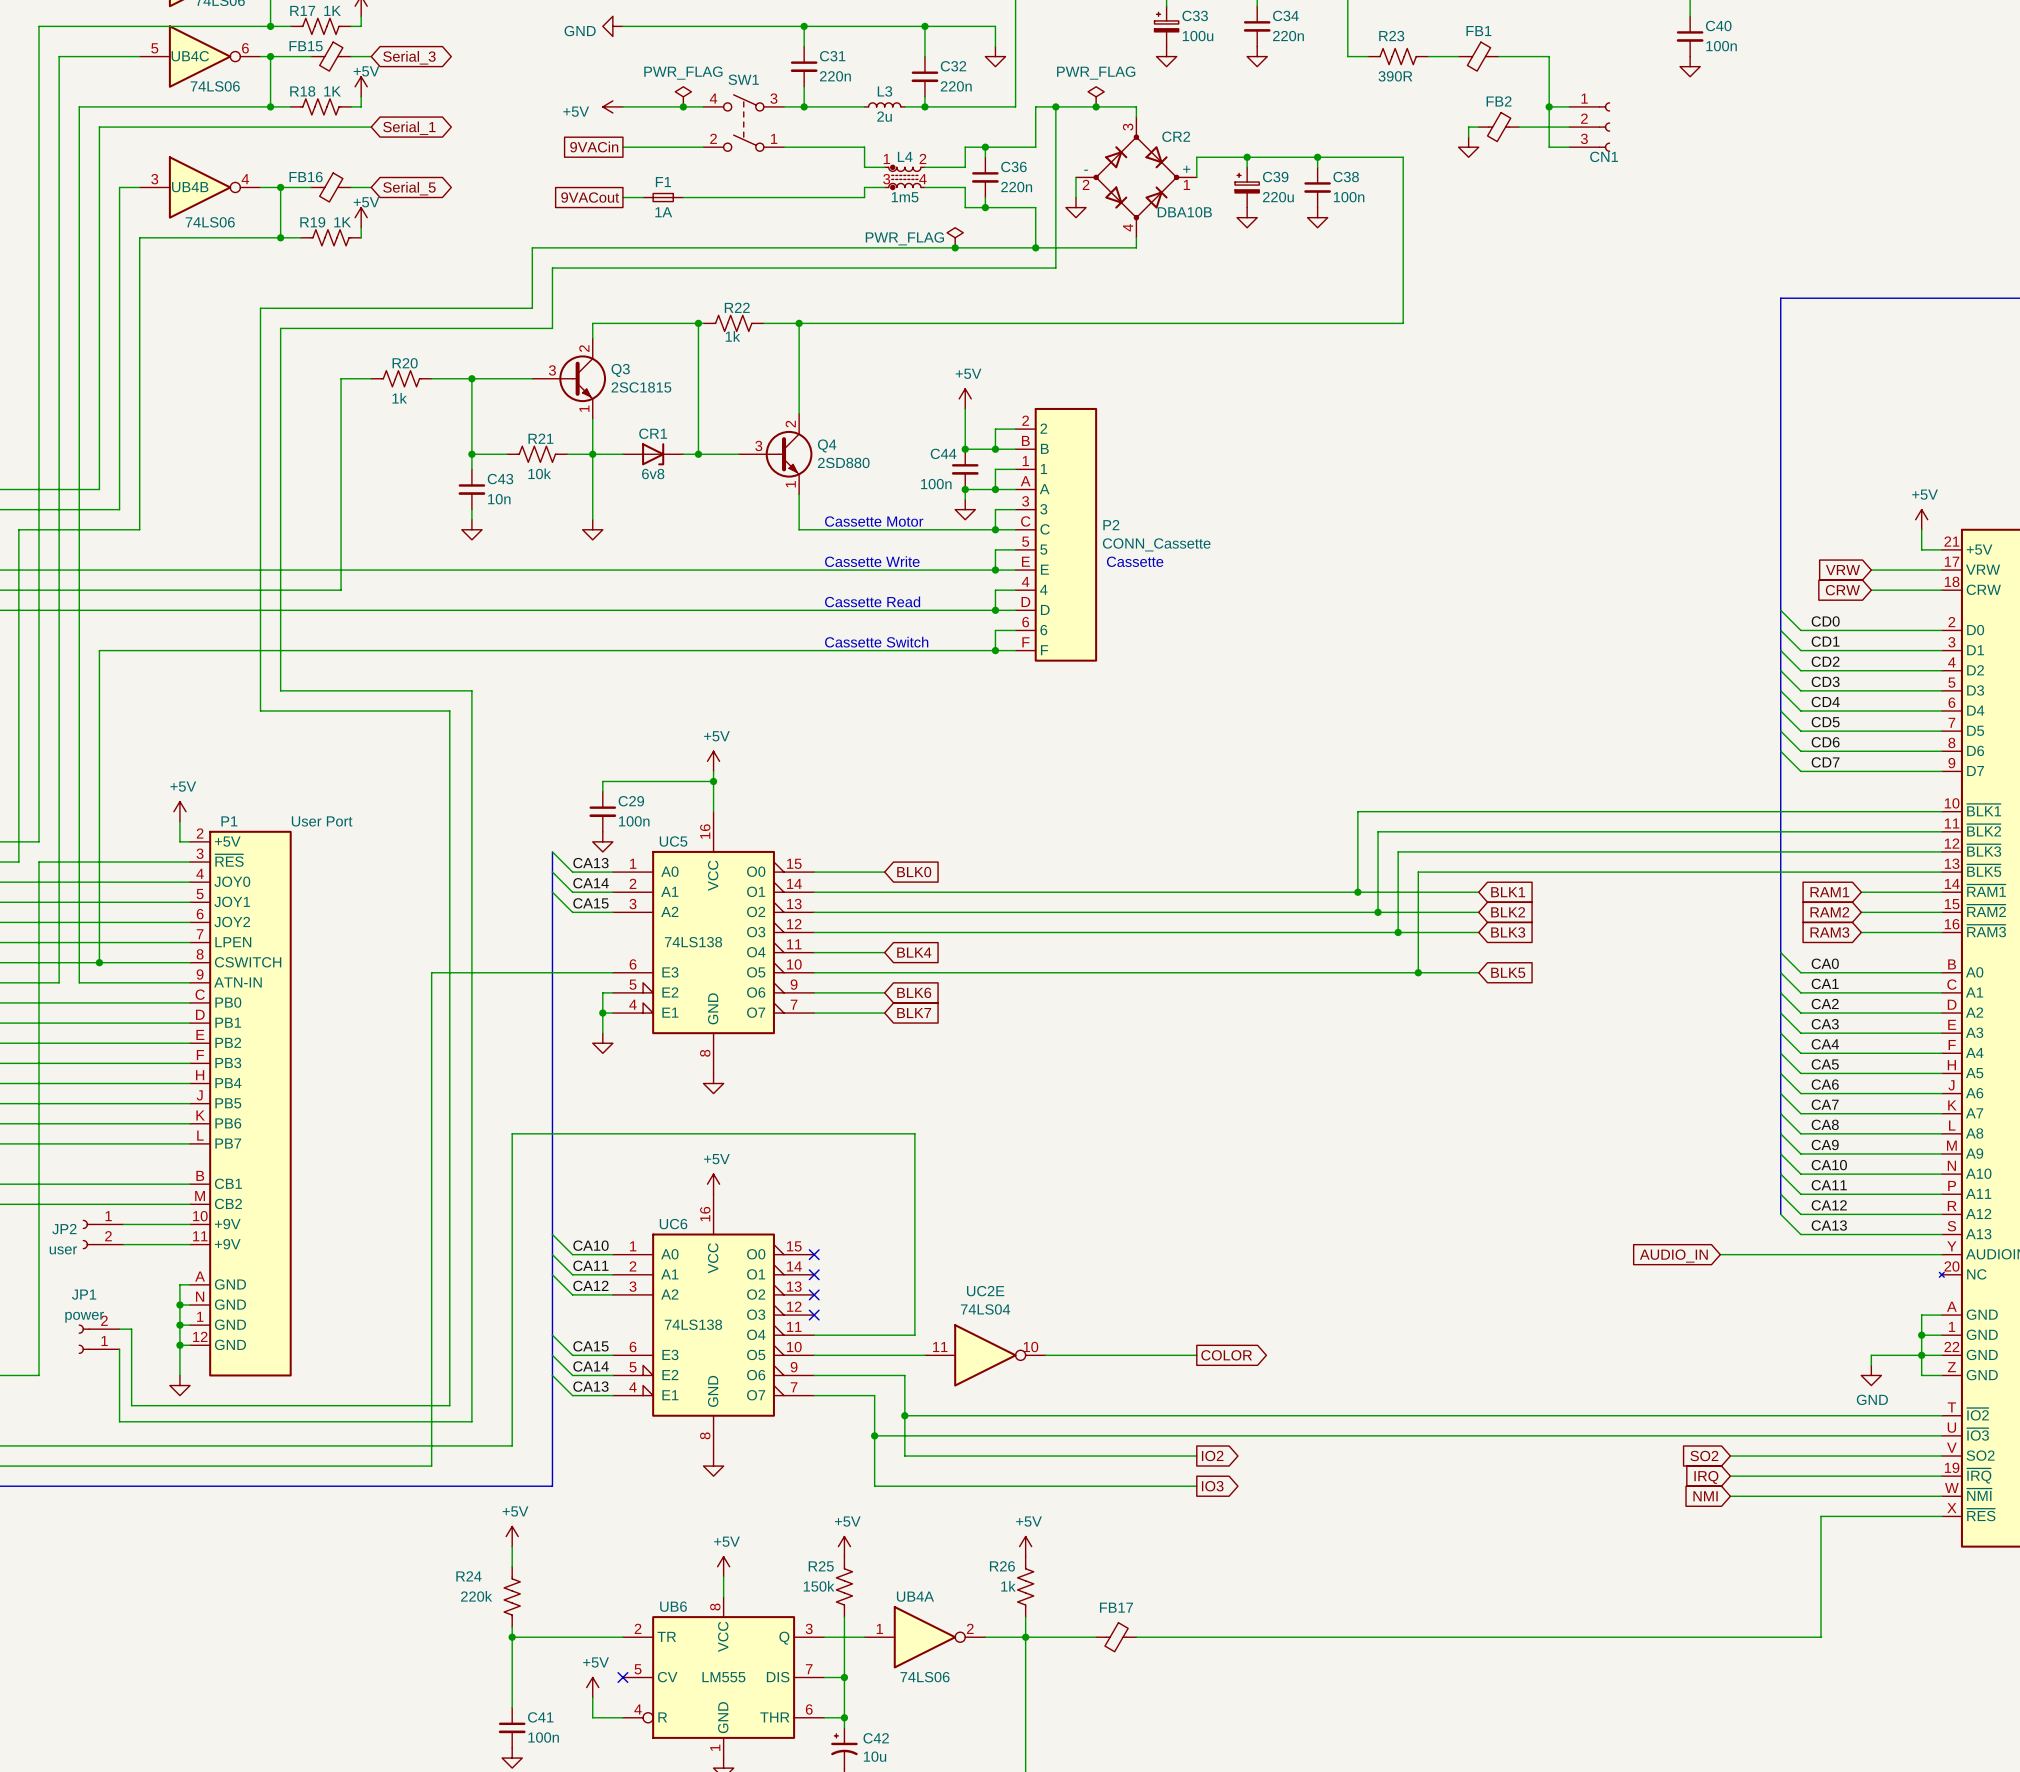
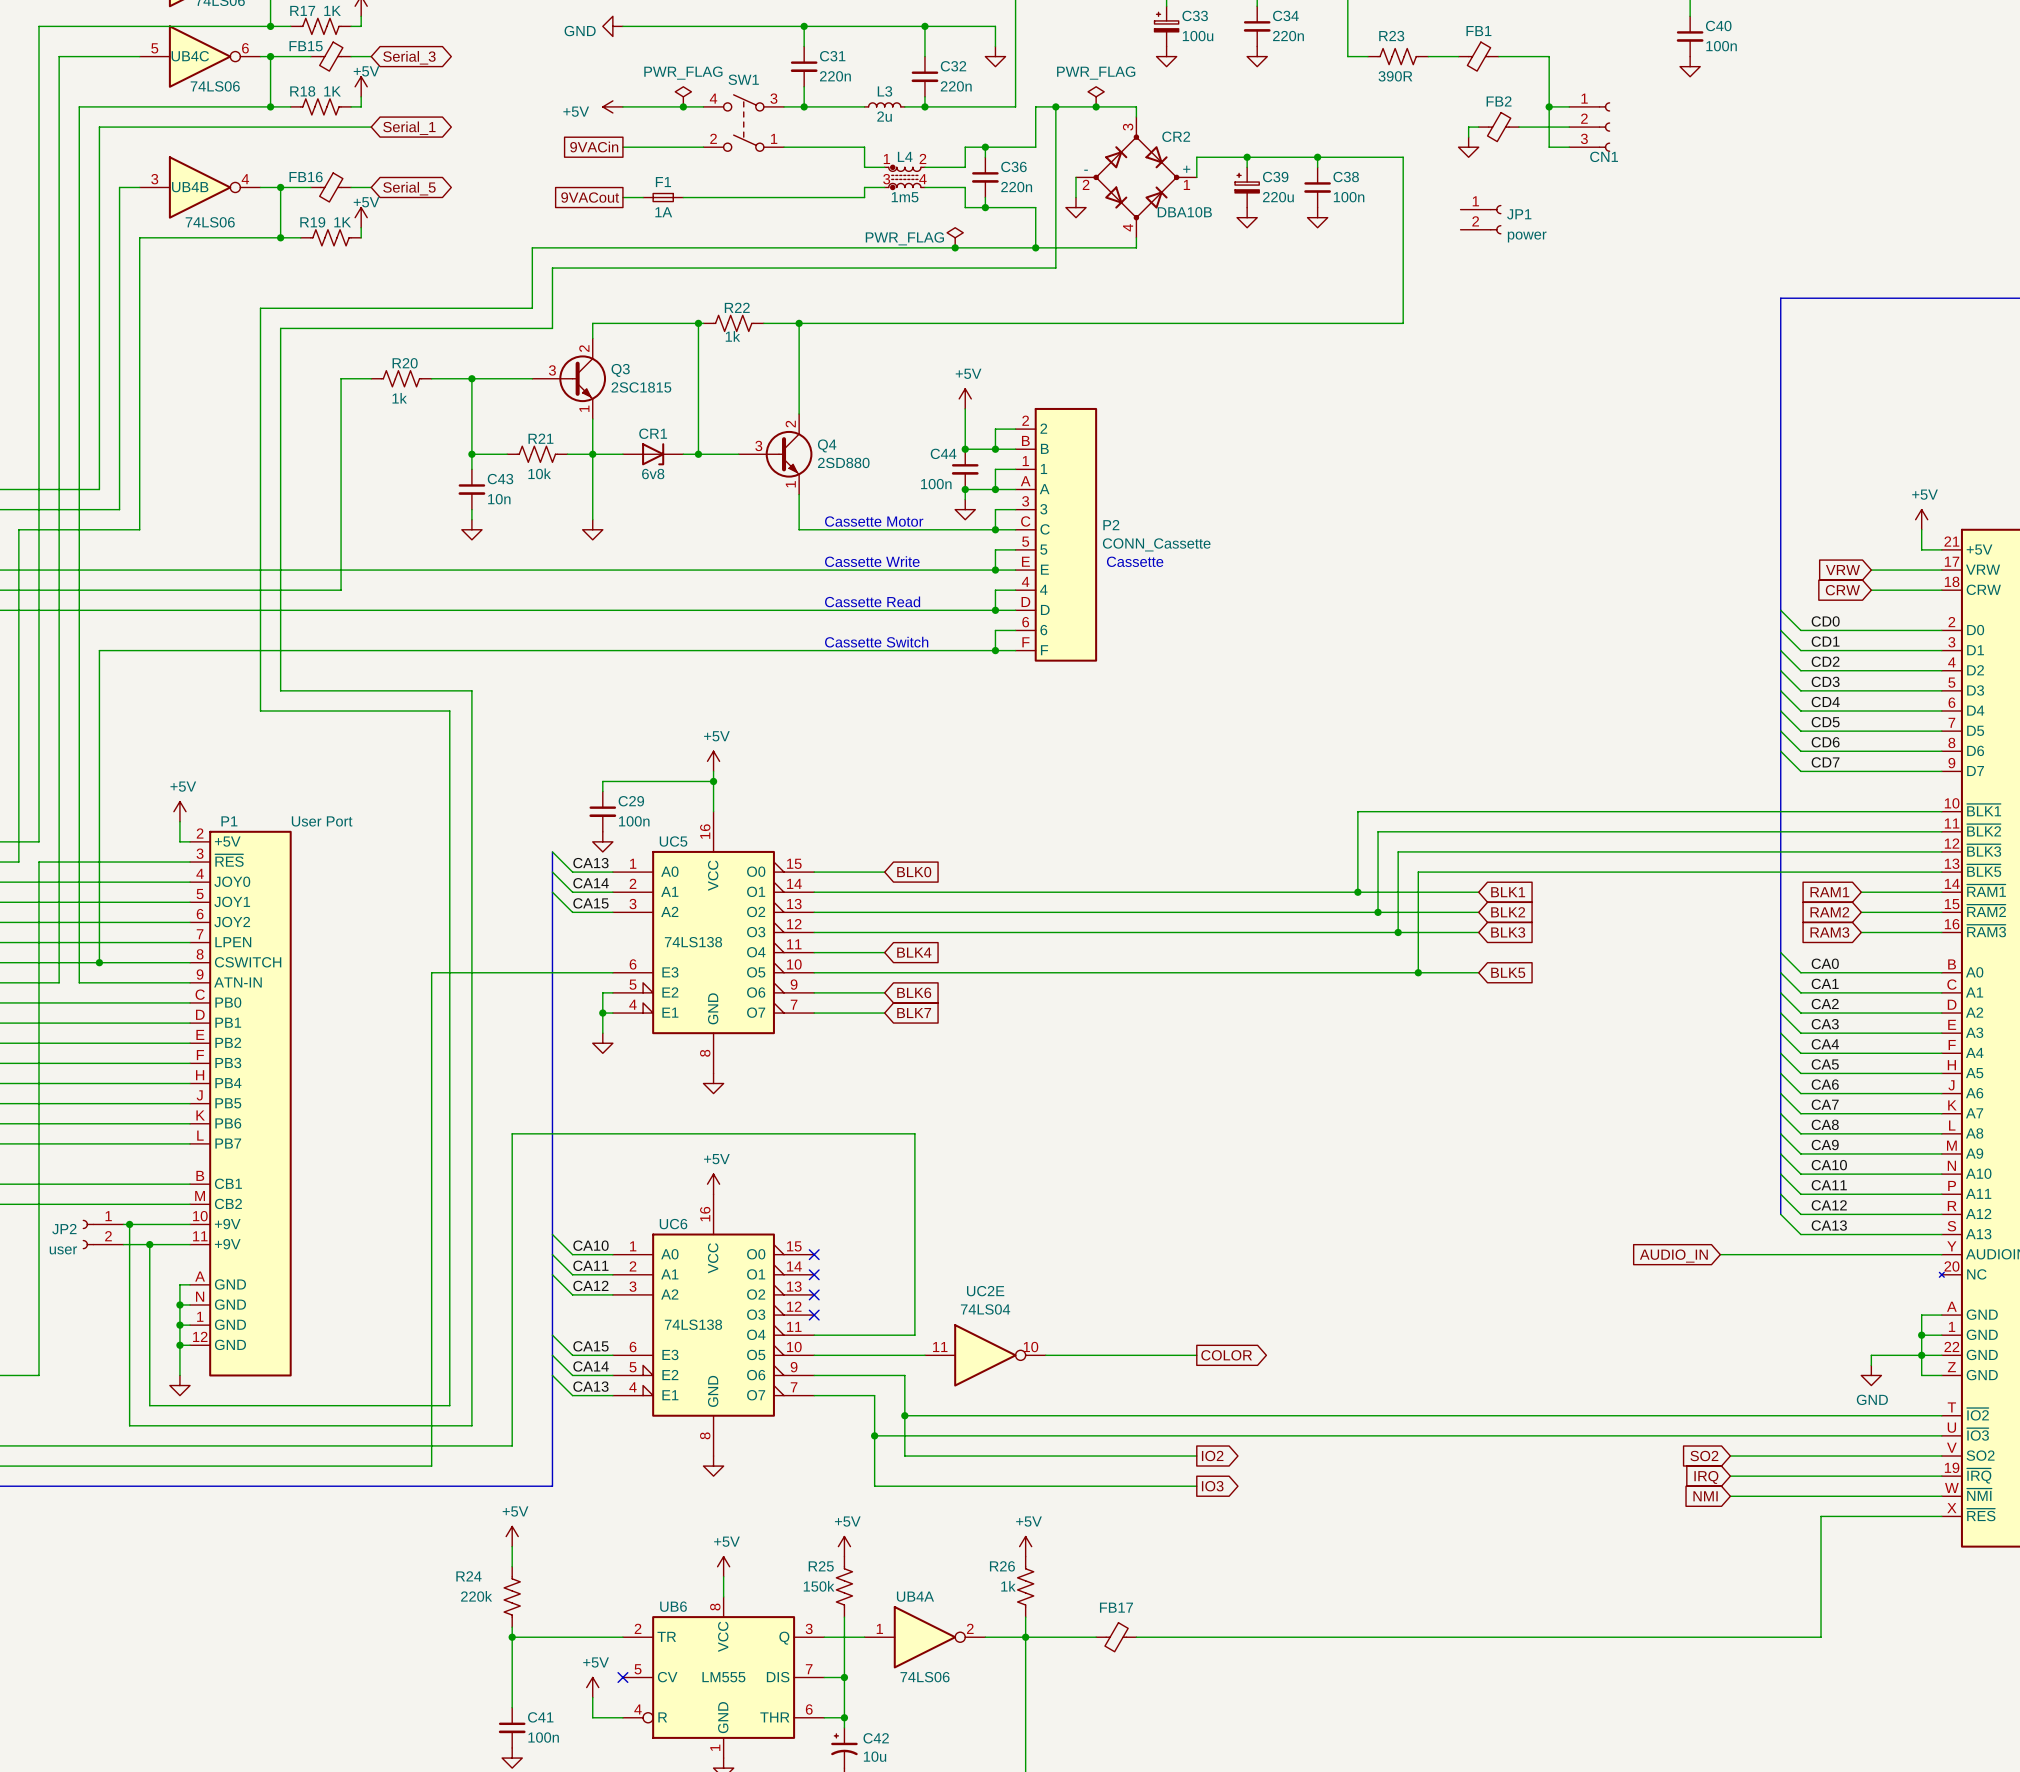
junction: none -> (129, 1224)
junction: none -> (149, 1244)
JP1 name position: JP1 (84, 1294) -> JP1 (1519, 214)
JP1 value position: power (84, 1317) -> power (1527, 237)
wire: (119, 1329) (131, 1329) (131, 1405) (149, 1405) -> (149, 1244) (149, 1405)
JP1 rotation: 0° (84, 1339) -> 180° (1495, 219)
JP1 position: (99, 1339) -> (1481, 219)
wire: (119, 1349) (119, 1421) (471, 1421) -> (129, 1224) (129, 1425) (471, 1425) (471, 1421)

